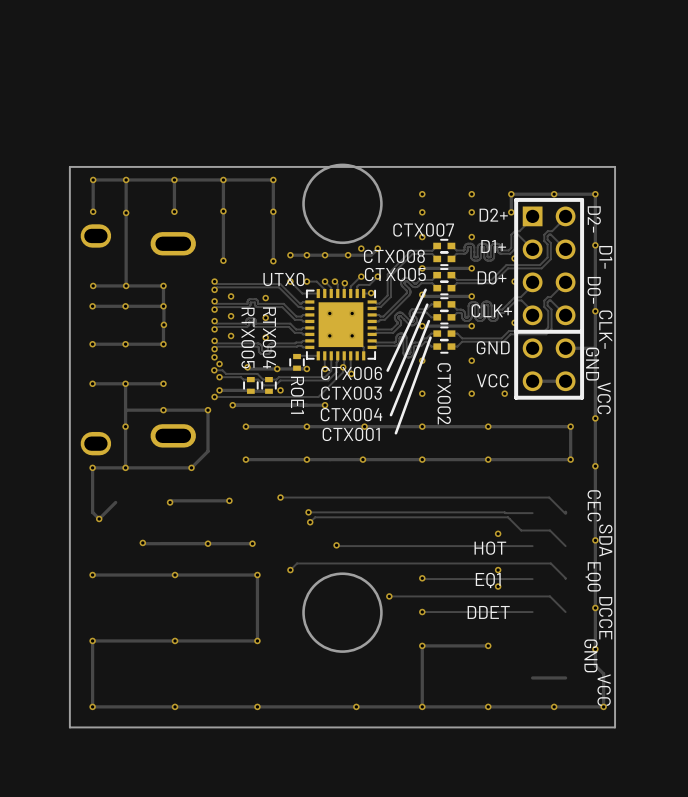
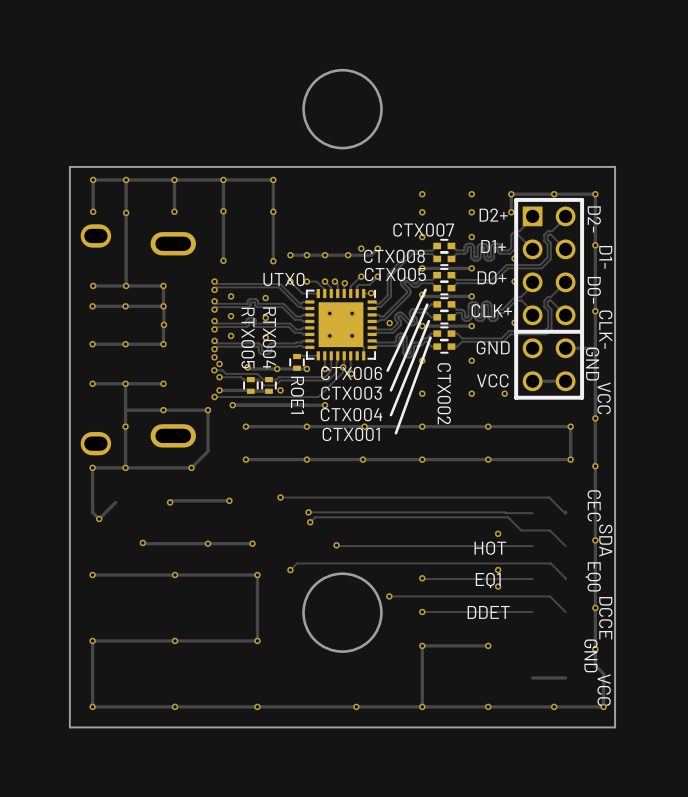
round board edge position: (342, 203) -> (342, 109)
via: none -> (389, 323)

